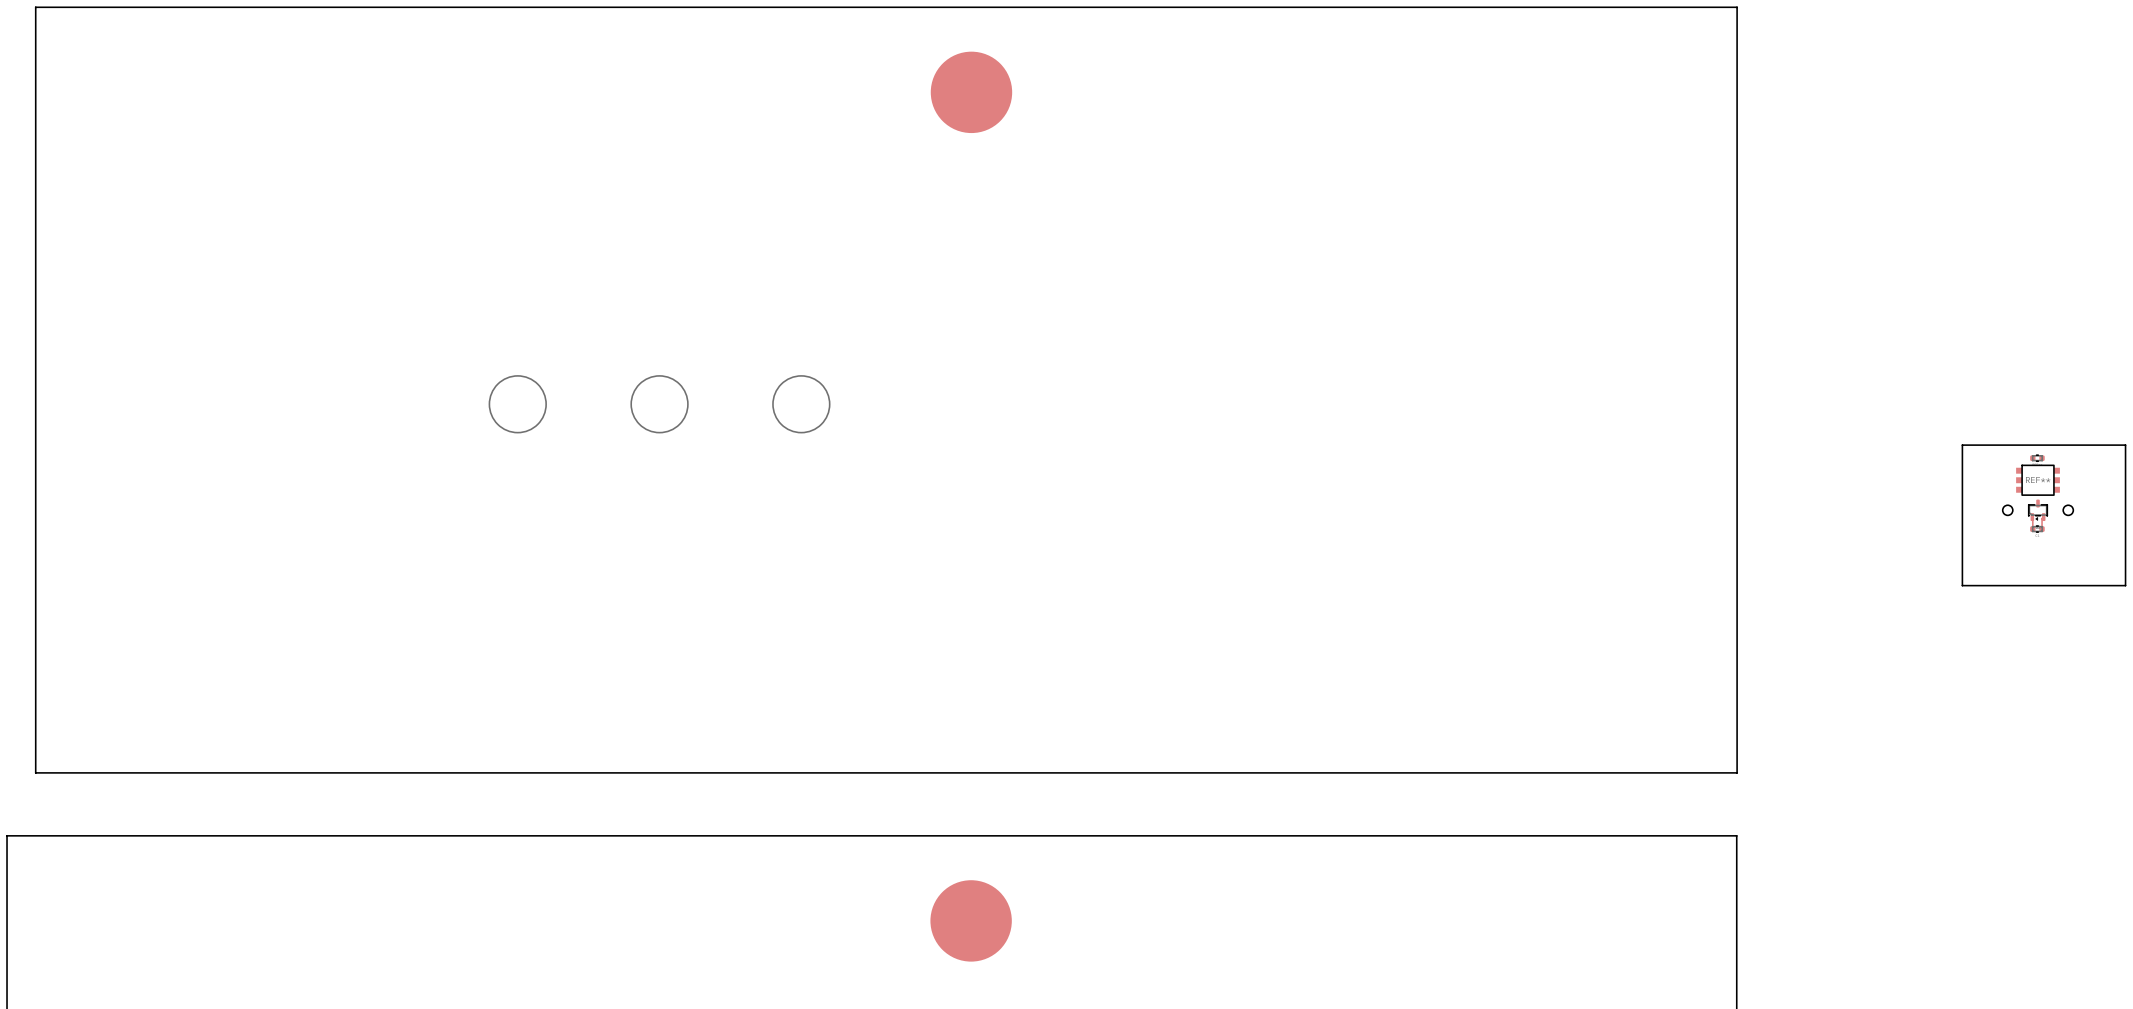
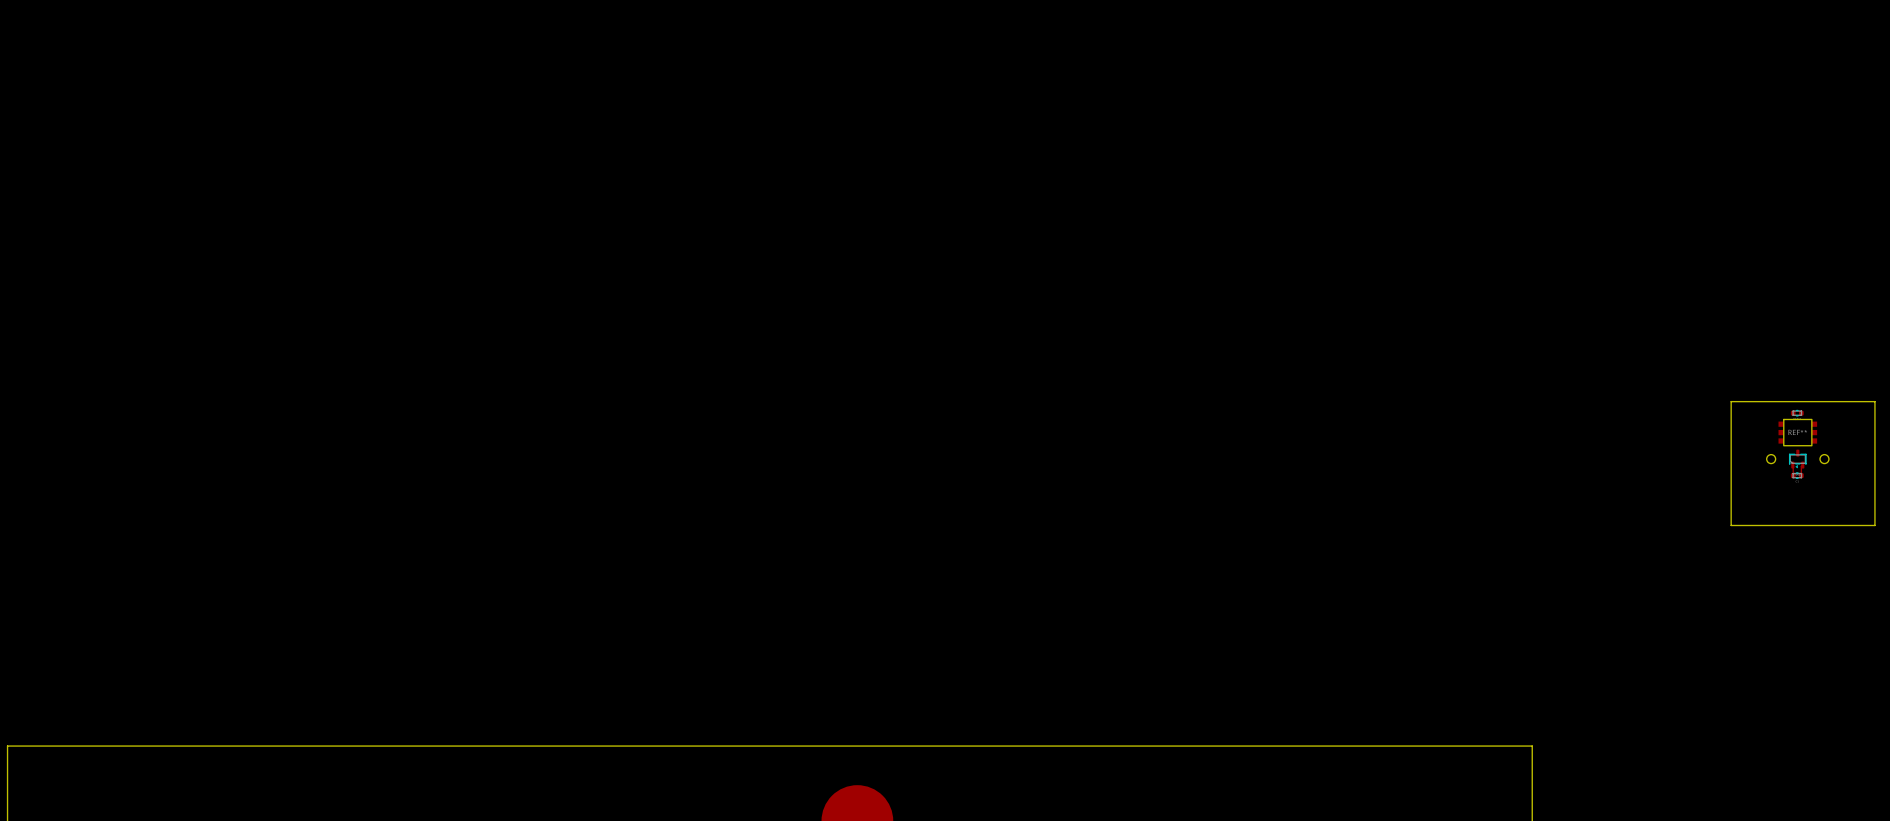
board edge: (35, 7) (1737, 7) (1737, 772) (35, 772) (35, 7) -> none
drawing: [930, 51, 1013, 134] -> none
drawing: [488, 375, 547, 434] -> none
drawing: [630, 375, 689, 434] -> none
drawing: [772, 375, 831, 434] -> none

